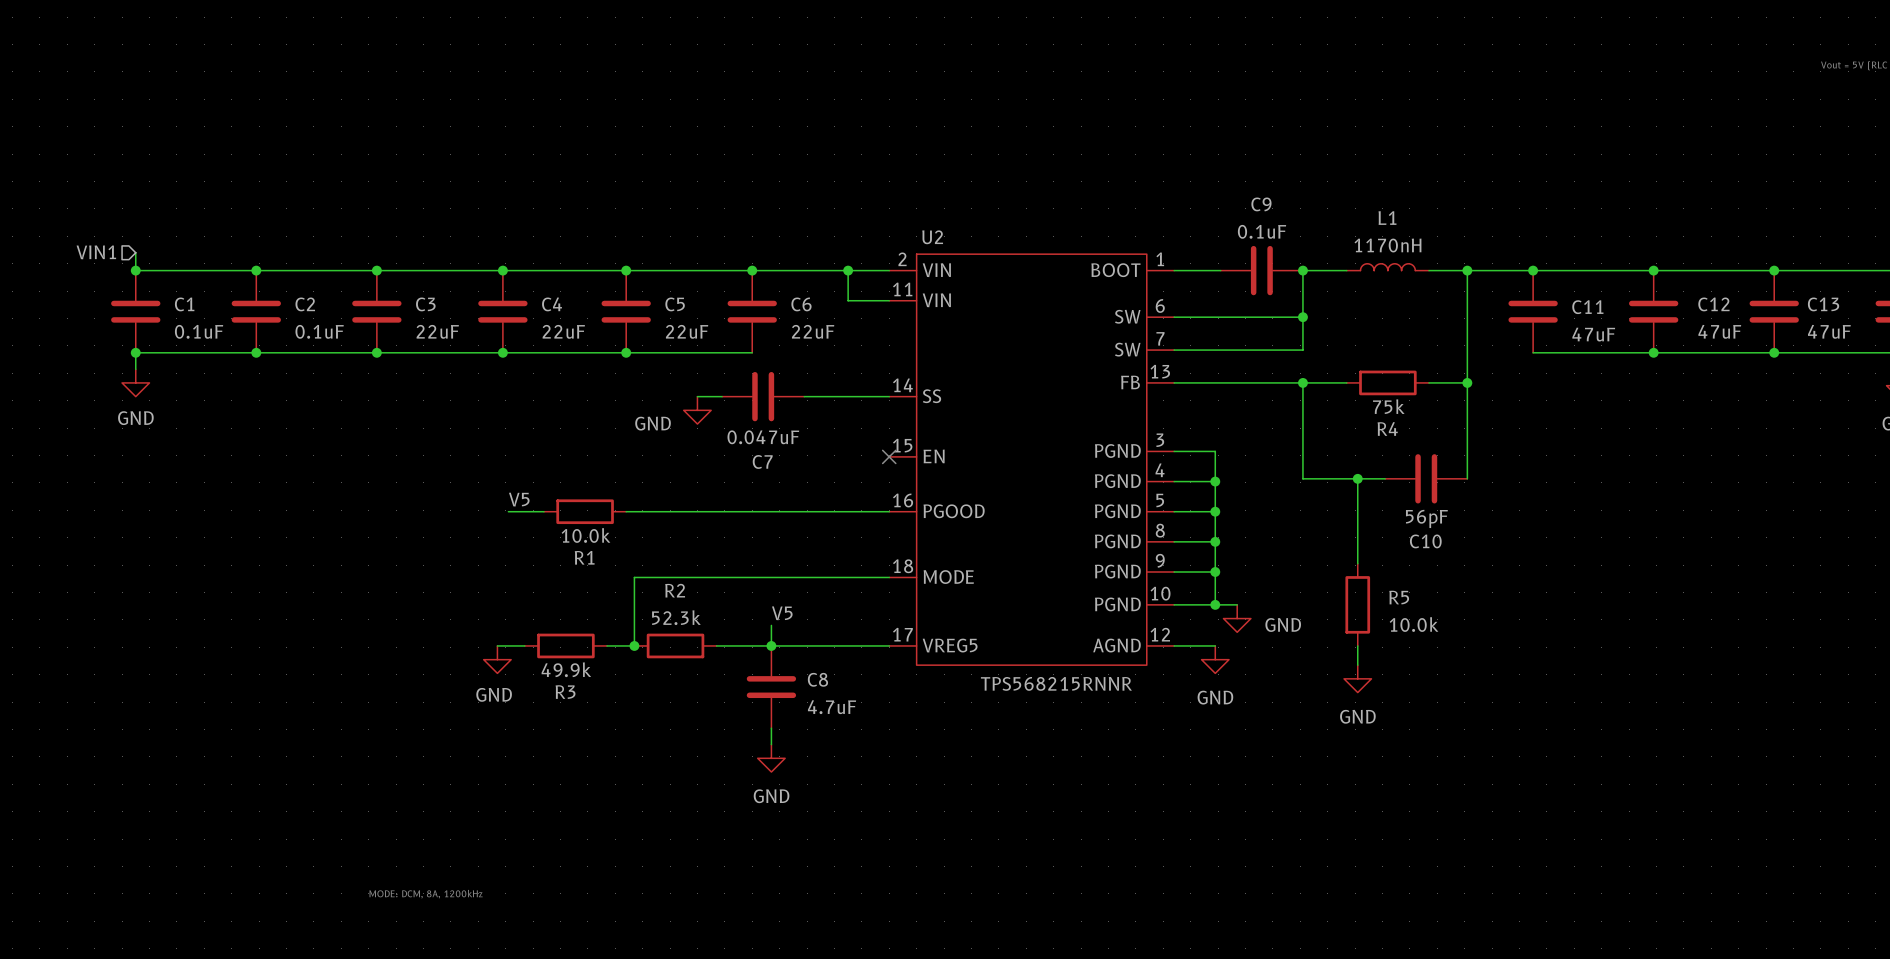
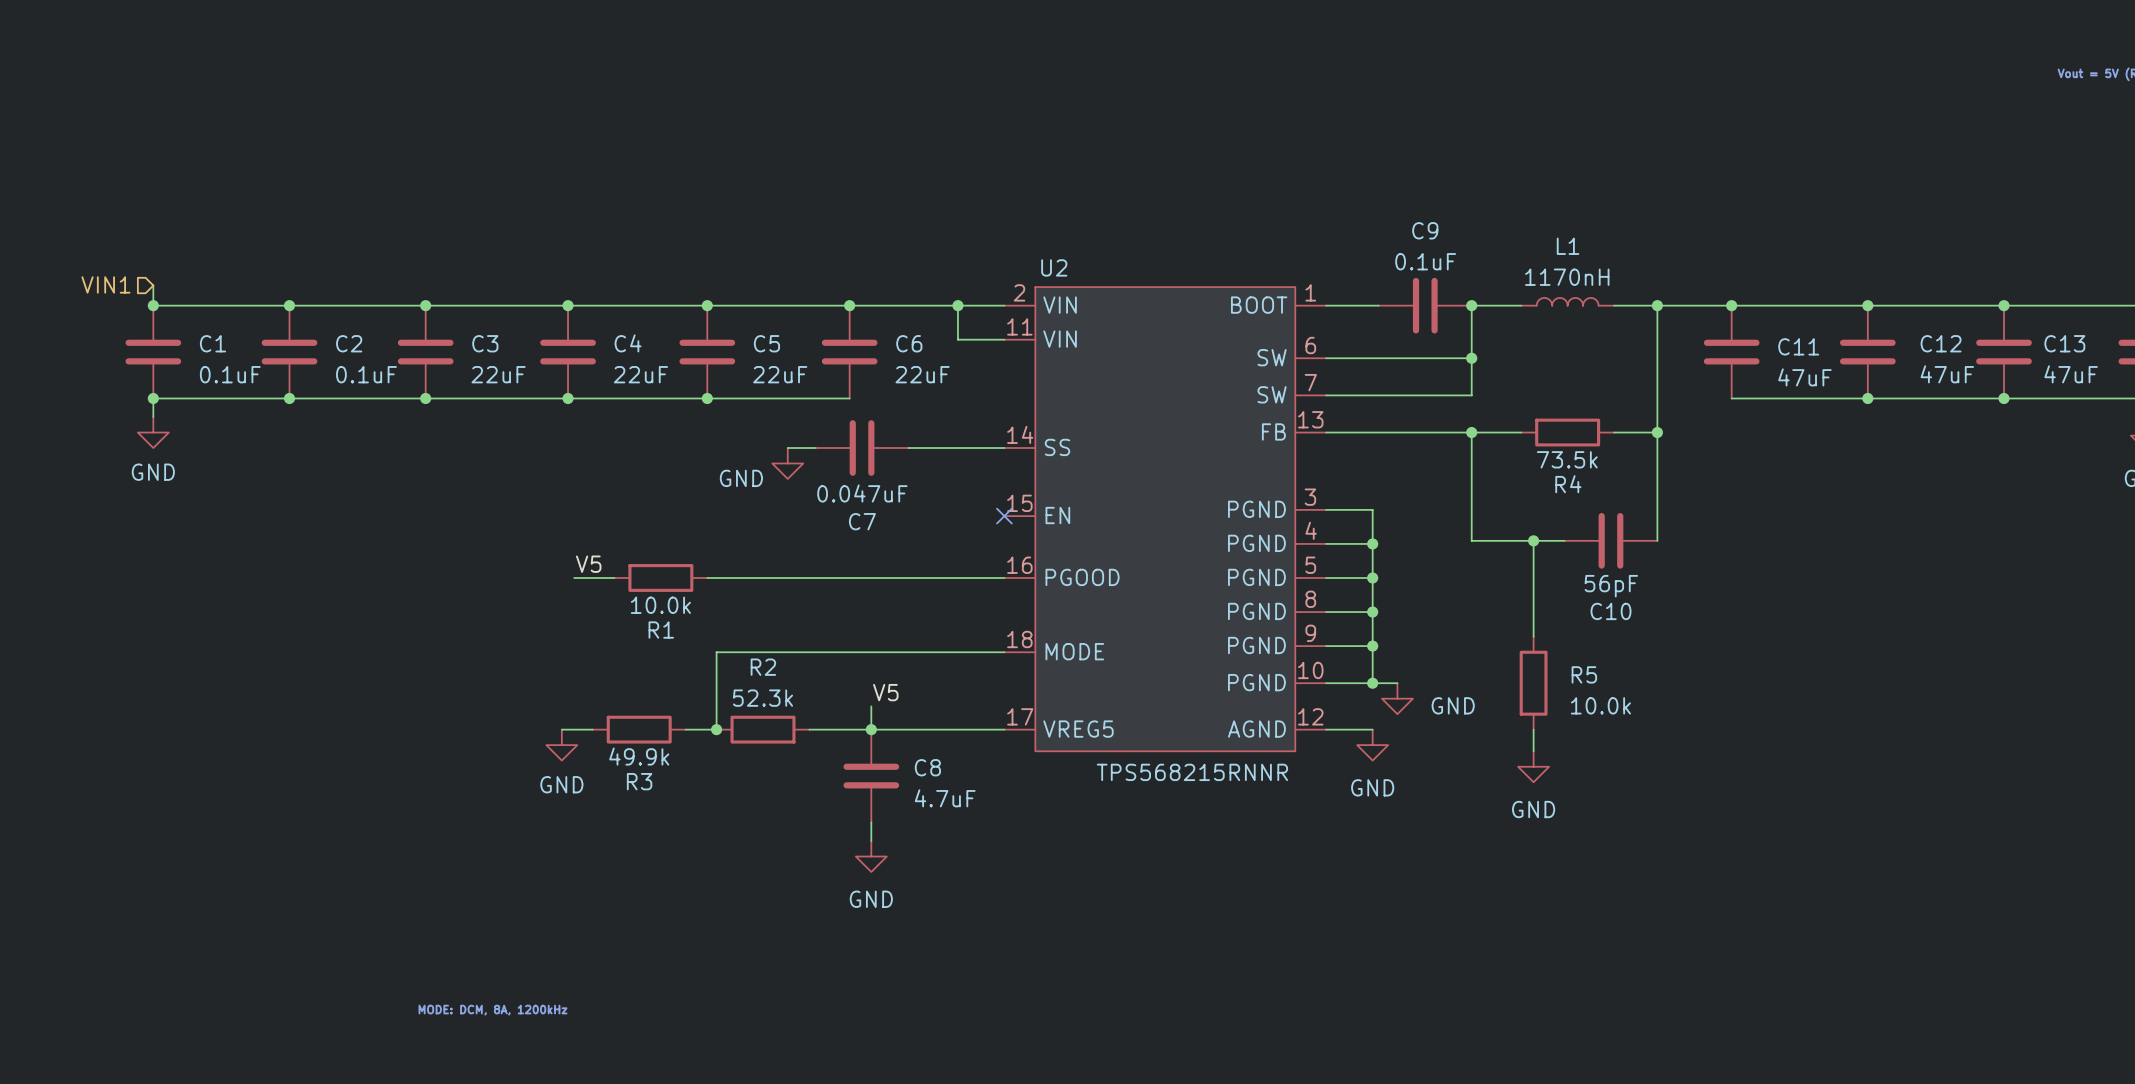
R4 value: 75k (1388, 406) -> 73.5k (1567, 459)

